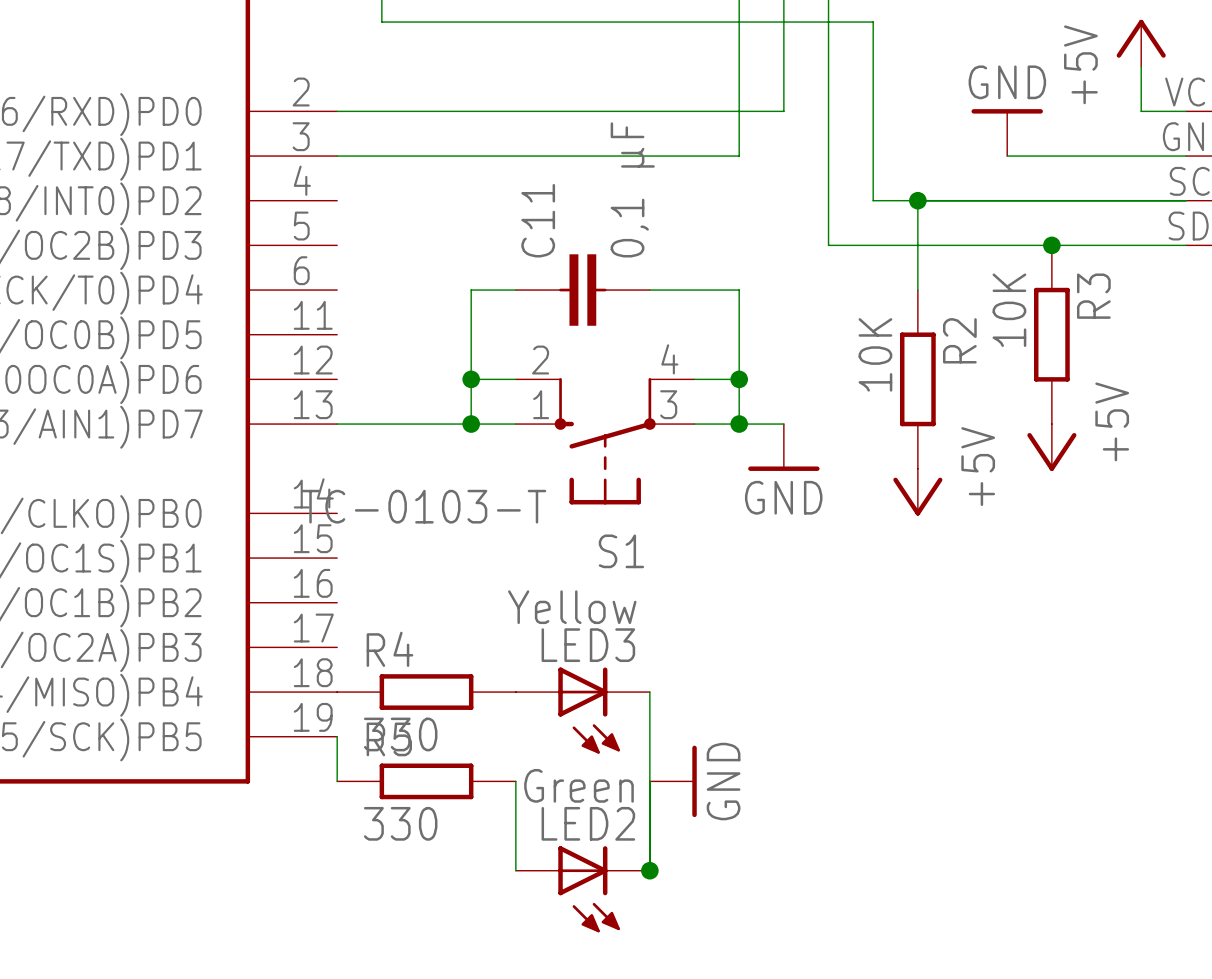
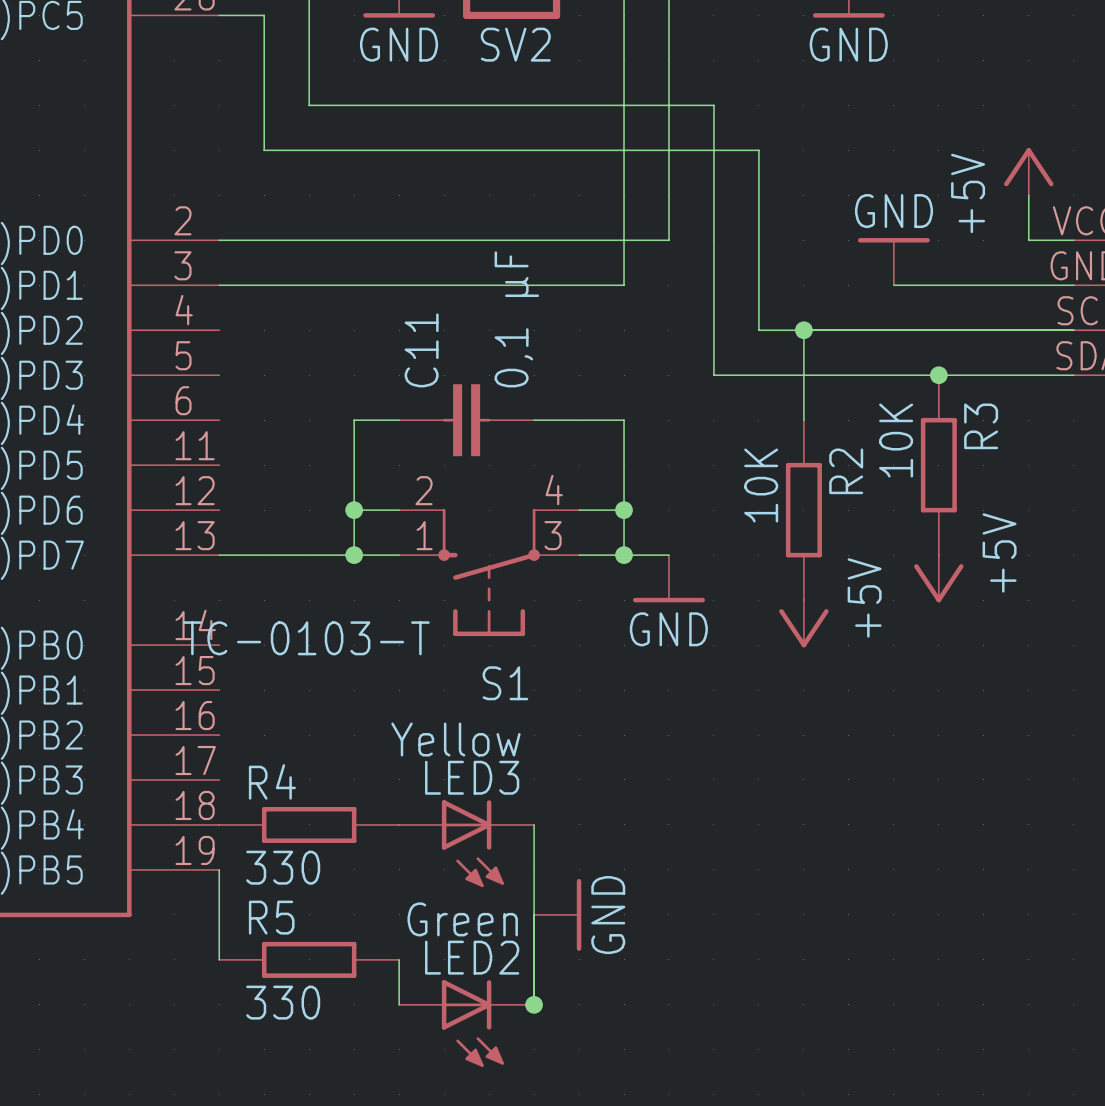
R5 position: (426, 781) -> (309, 959)
wire: (515, 781) (515, 826) -> (219, 914) (219, 959)

